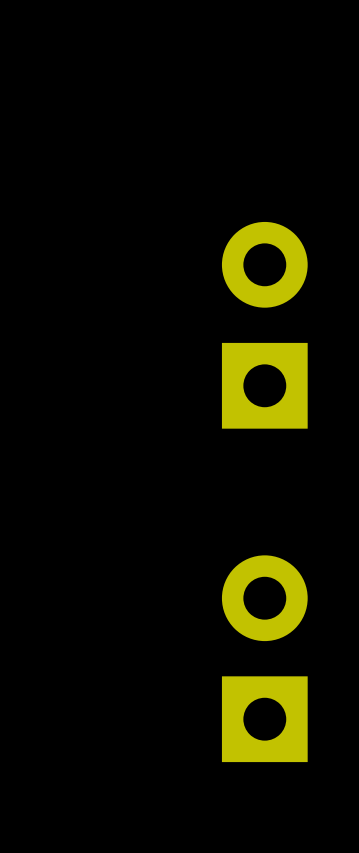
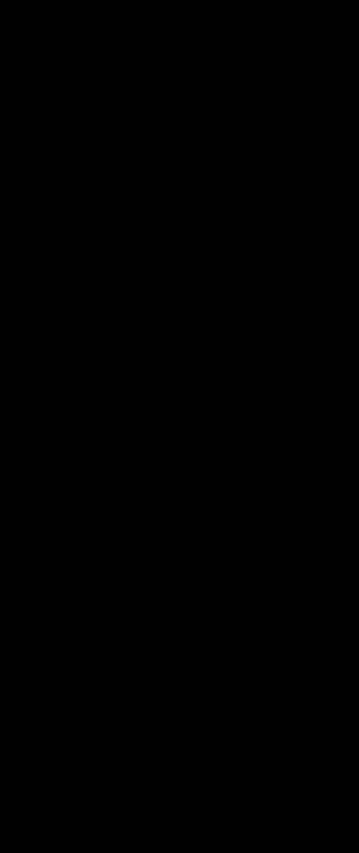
part: (264, 325) -> none
part: (264, 658) -> none

